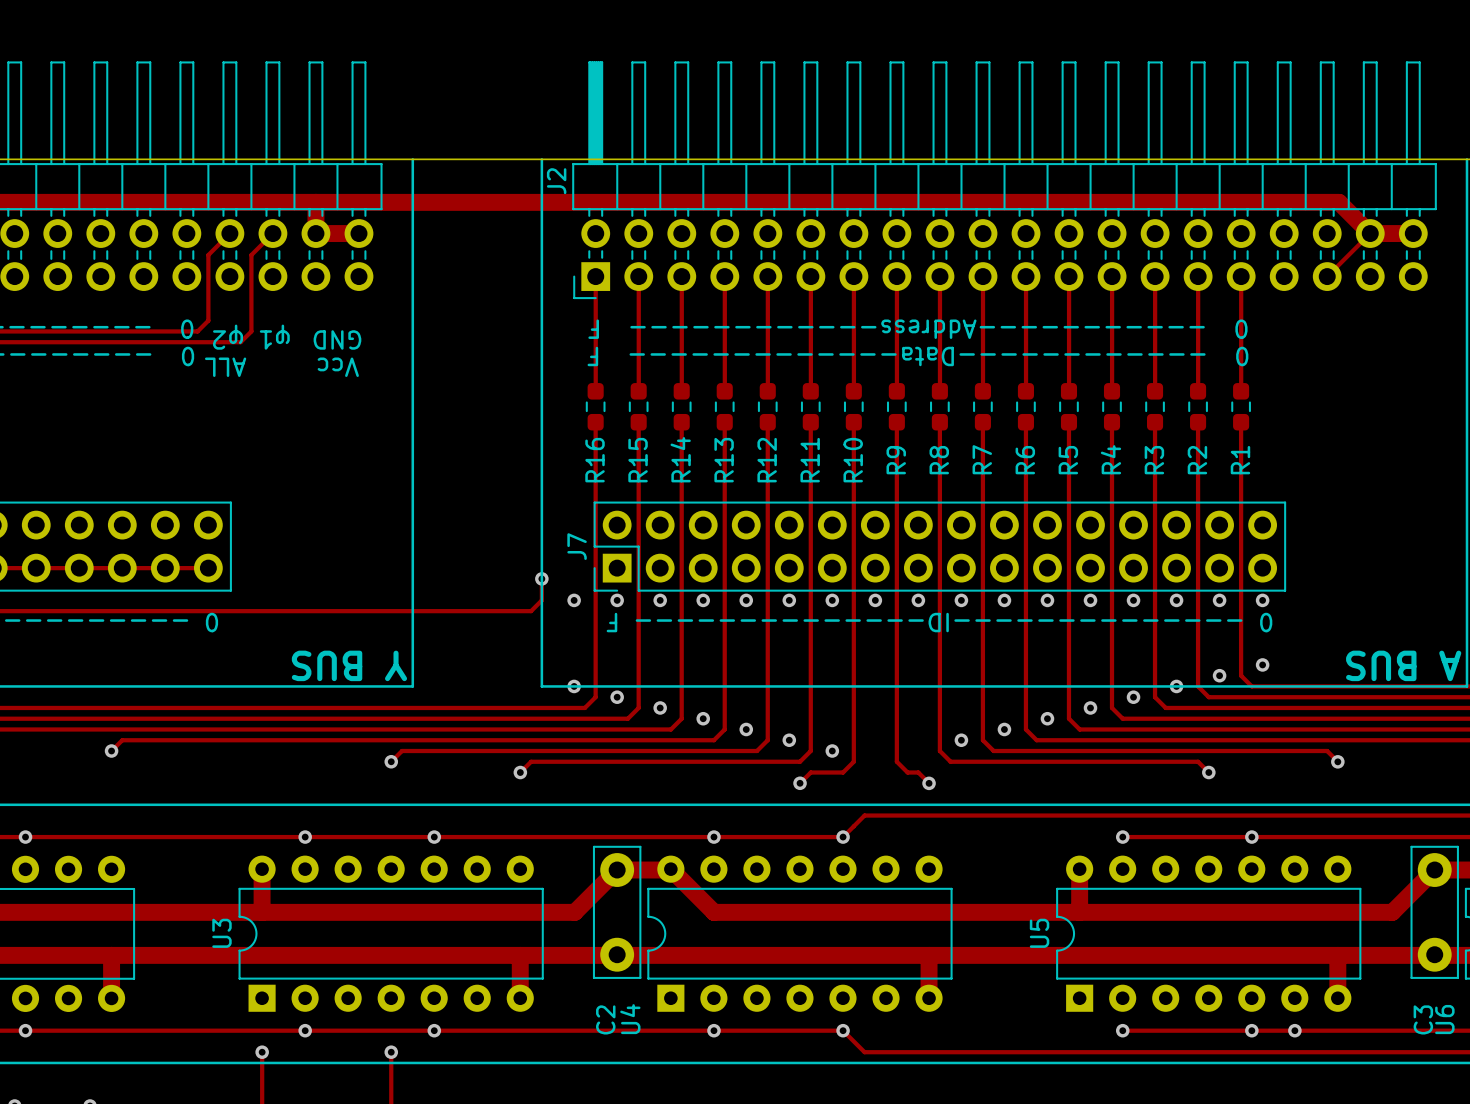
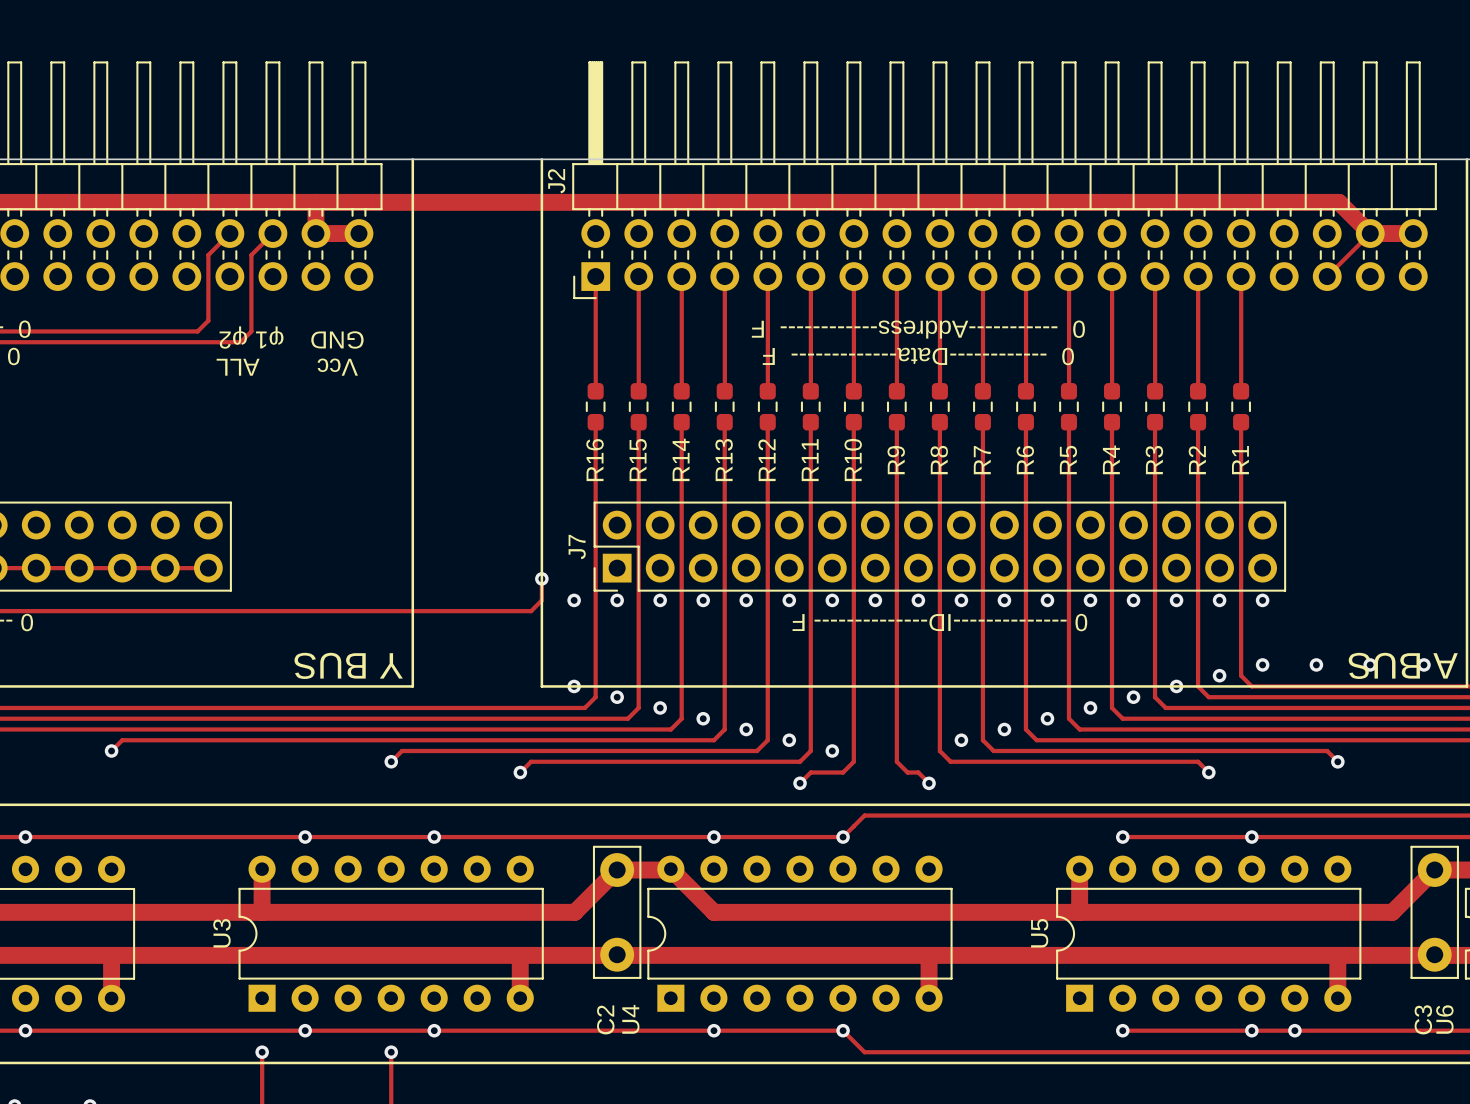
via: none -> (1316, 664)
via: none -> (1370, 664)
via: none -> (1423, 664)

